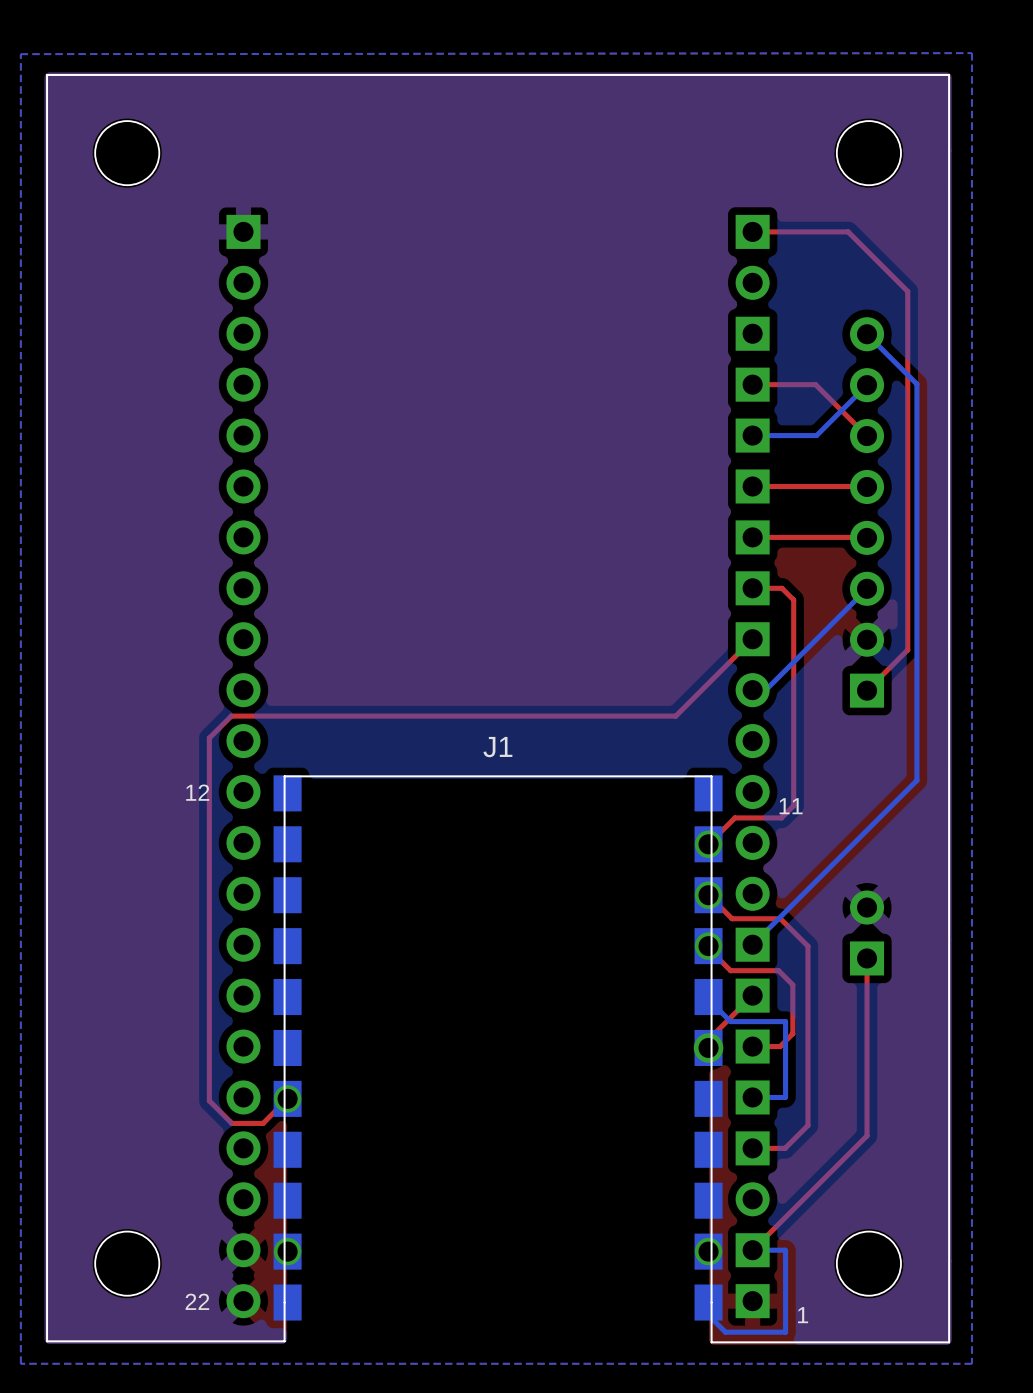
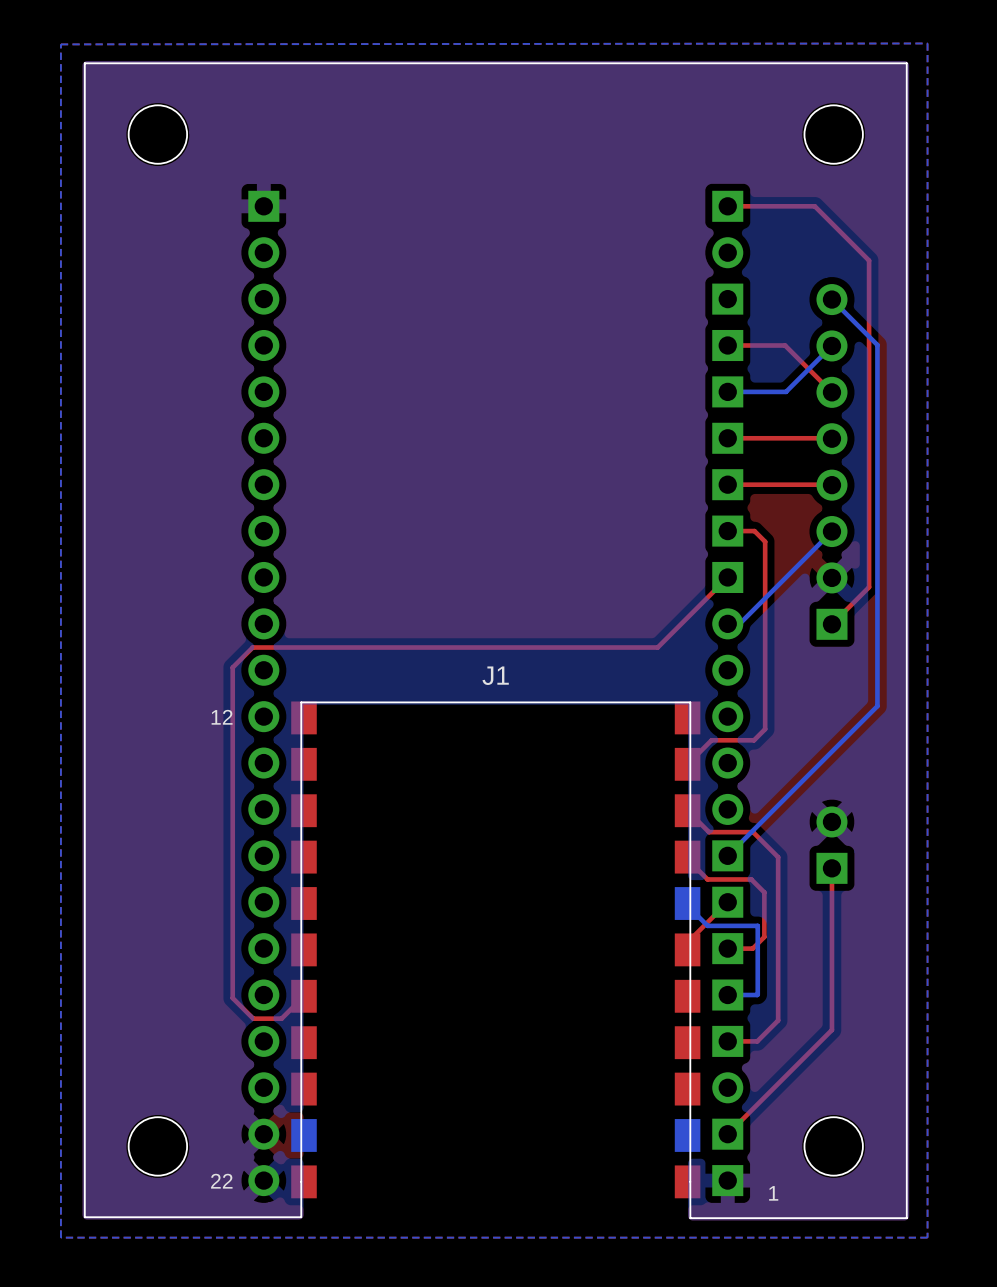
J1 footprint: [273, 775, 723, 1321] -> [291, 701, 701, 1199]
via: (708, 844) -> none
via: (708, 895) -> none
via: (708, 946) -> none
via: (708, 1047) -> none
via: (287, 1098) -> none
bottom track: (752, 1250) (785, 1250) (785, 1332) (725, 1332) (713, 1320) (713, 1302) -> none
via: (287, 1251) -> none
via: (708, 1251) -> none

